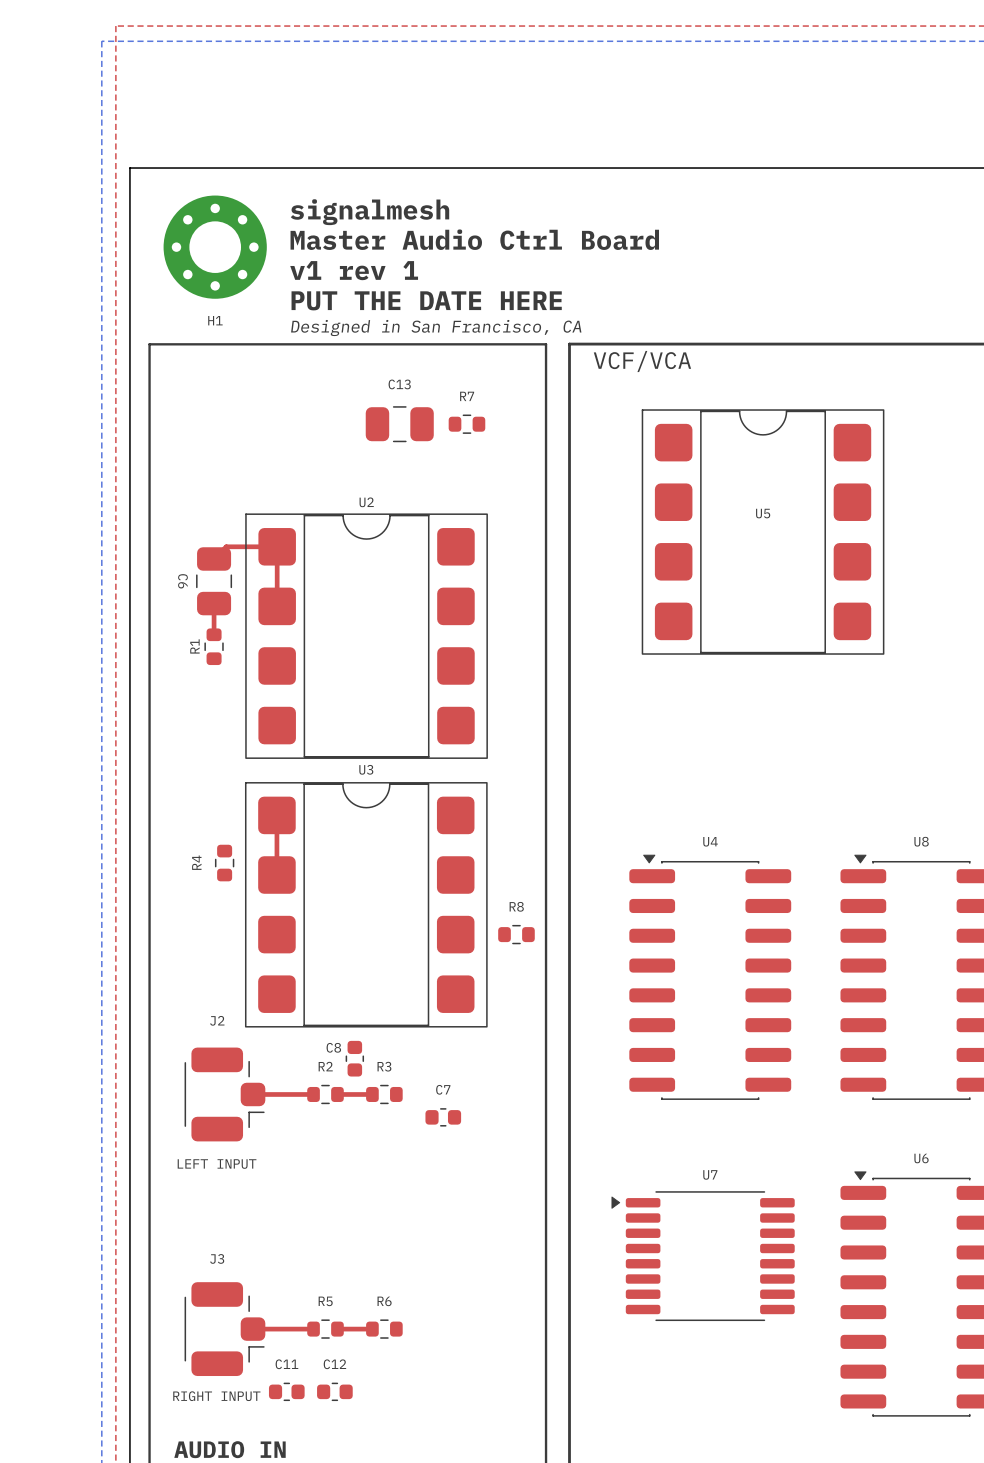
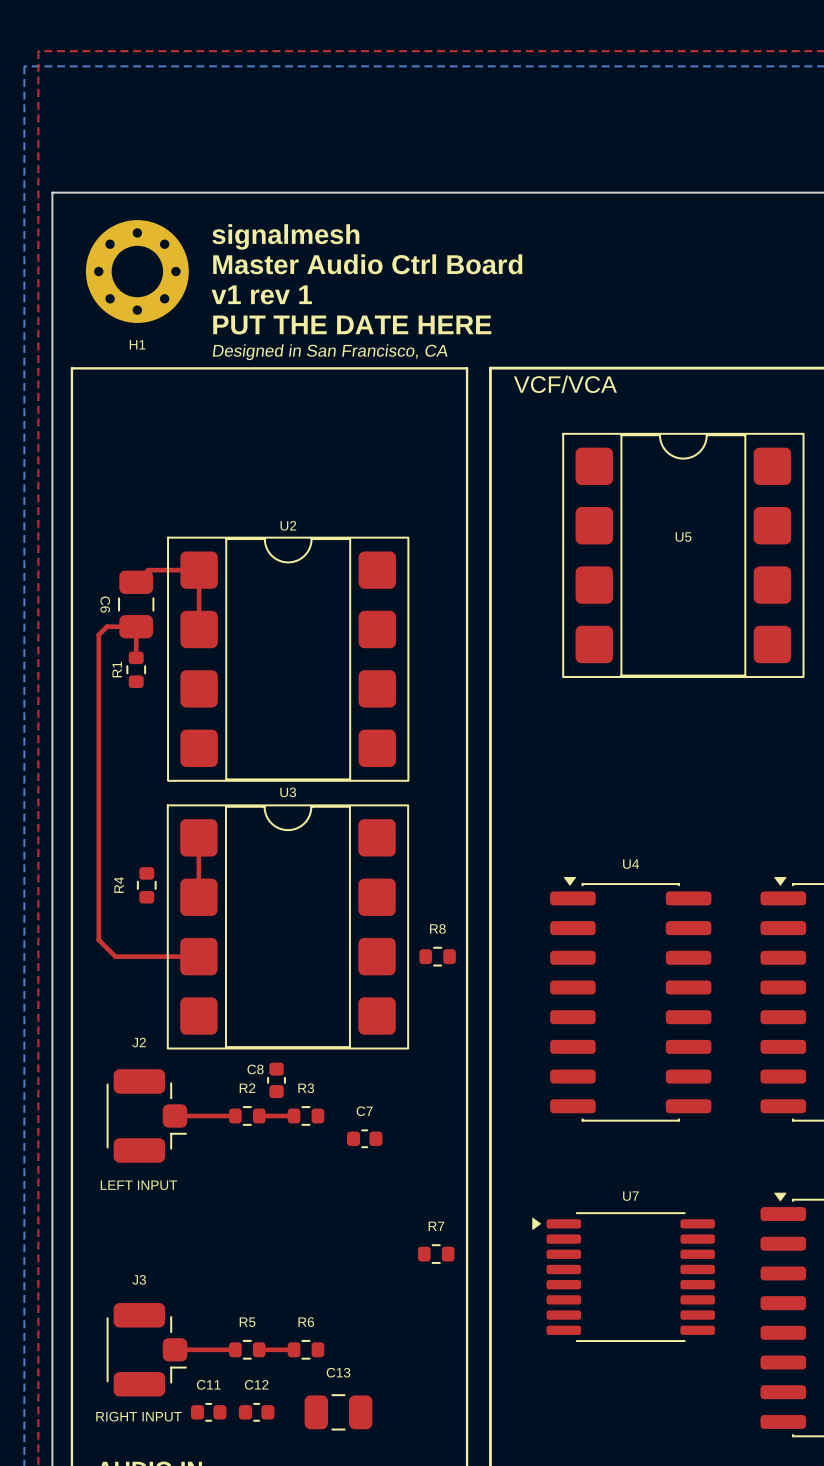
C13 position: (399, 424) -> (338, 1412)
R7 position: (466, 424) -> (436, 1254)
top track: none -> (136, 626) (107, 626) (98, 634) (98, 940) (115, 956) (198, 956)

